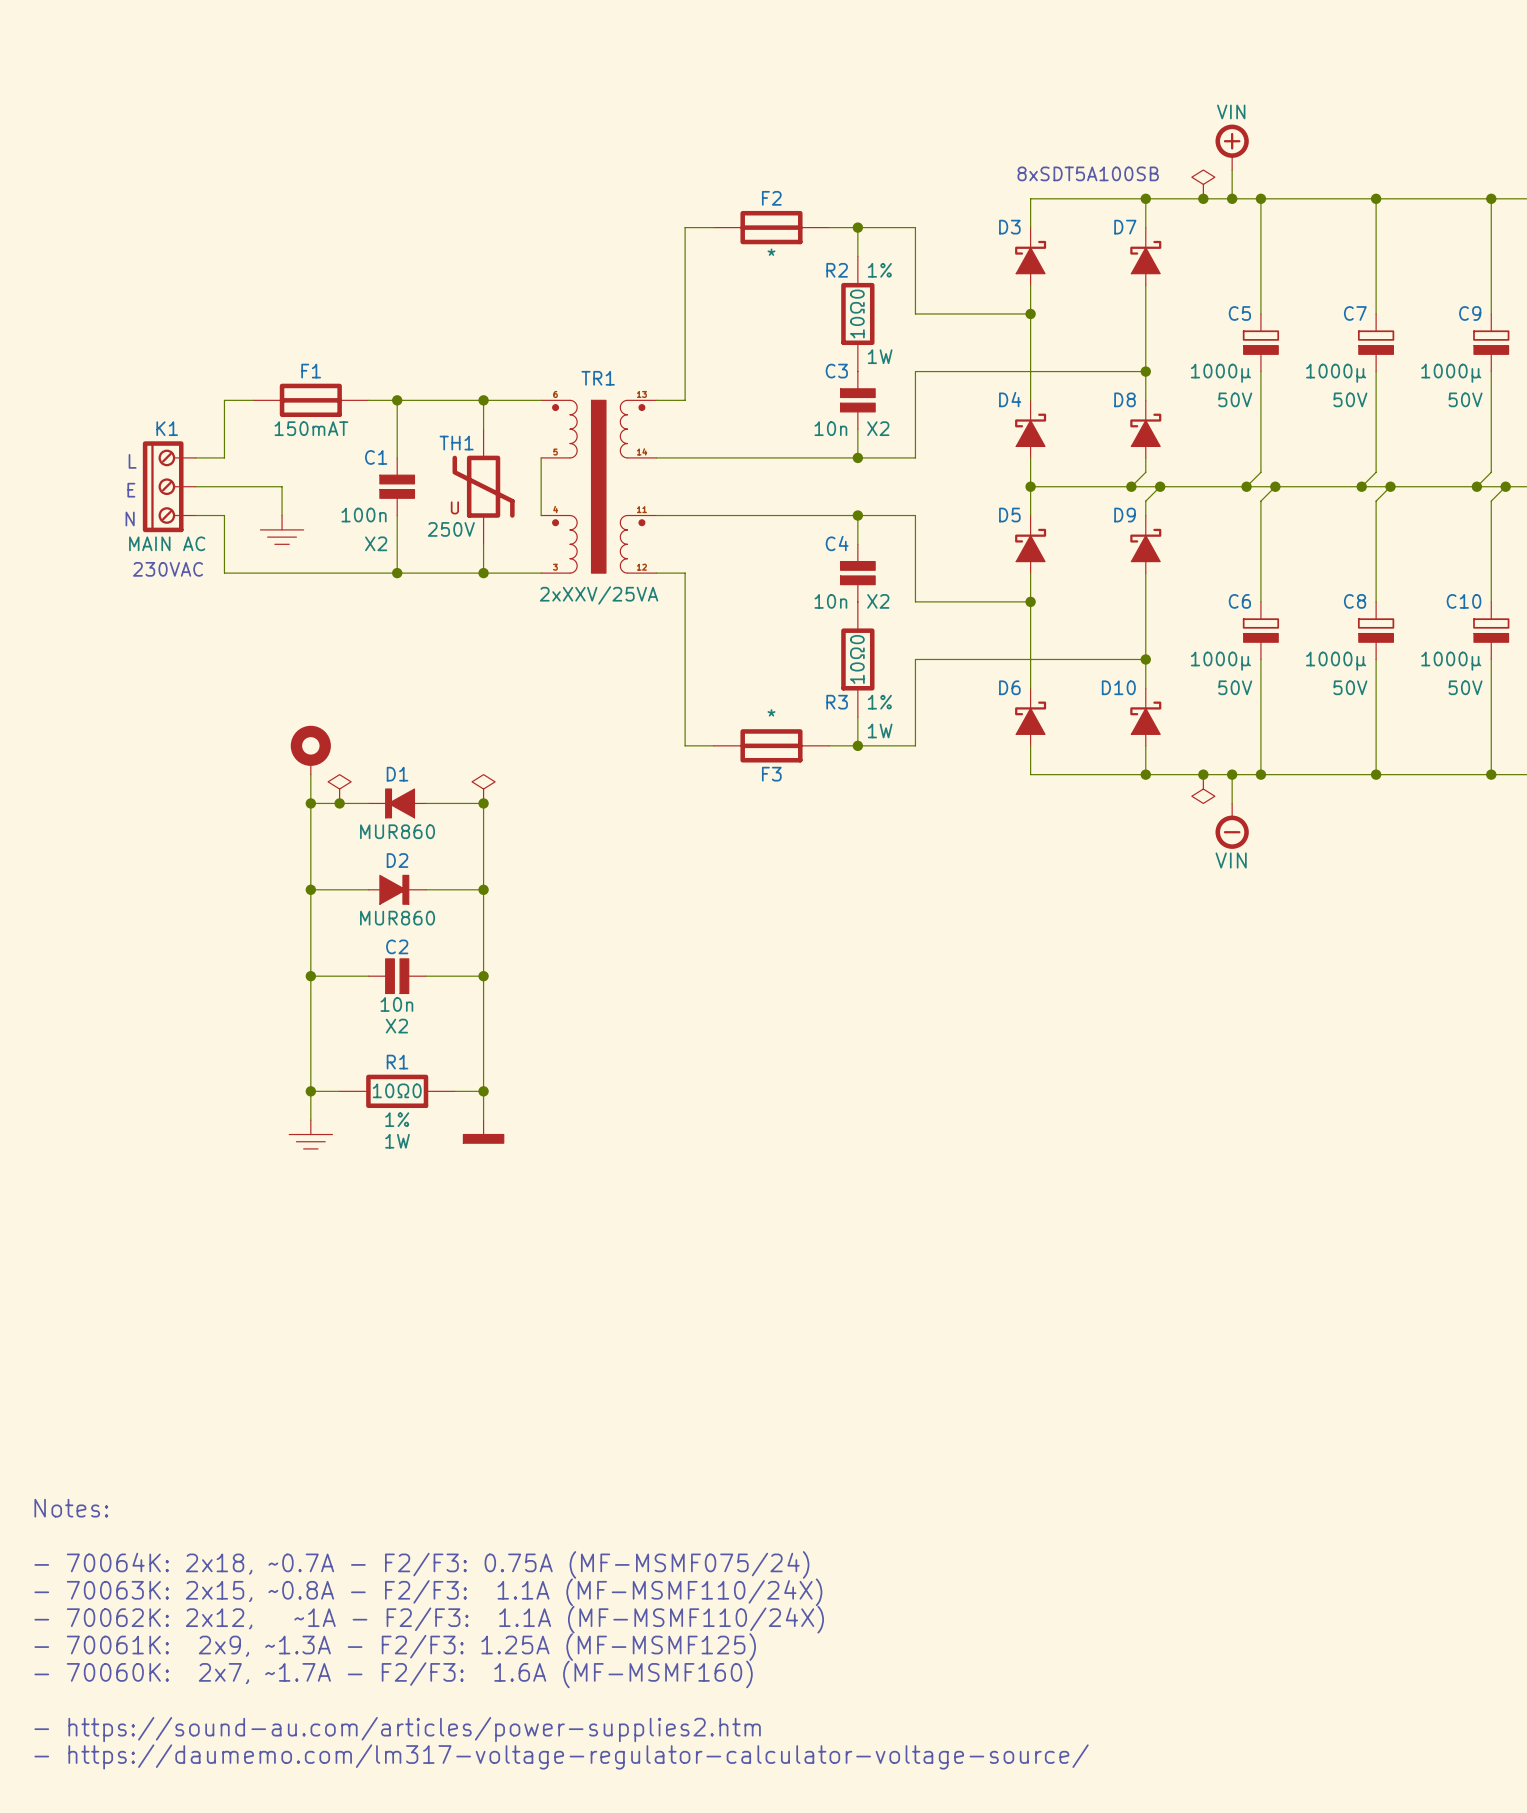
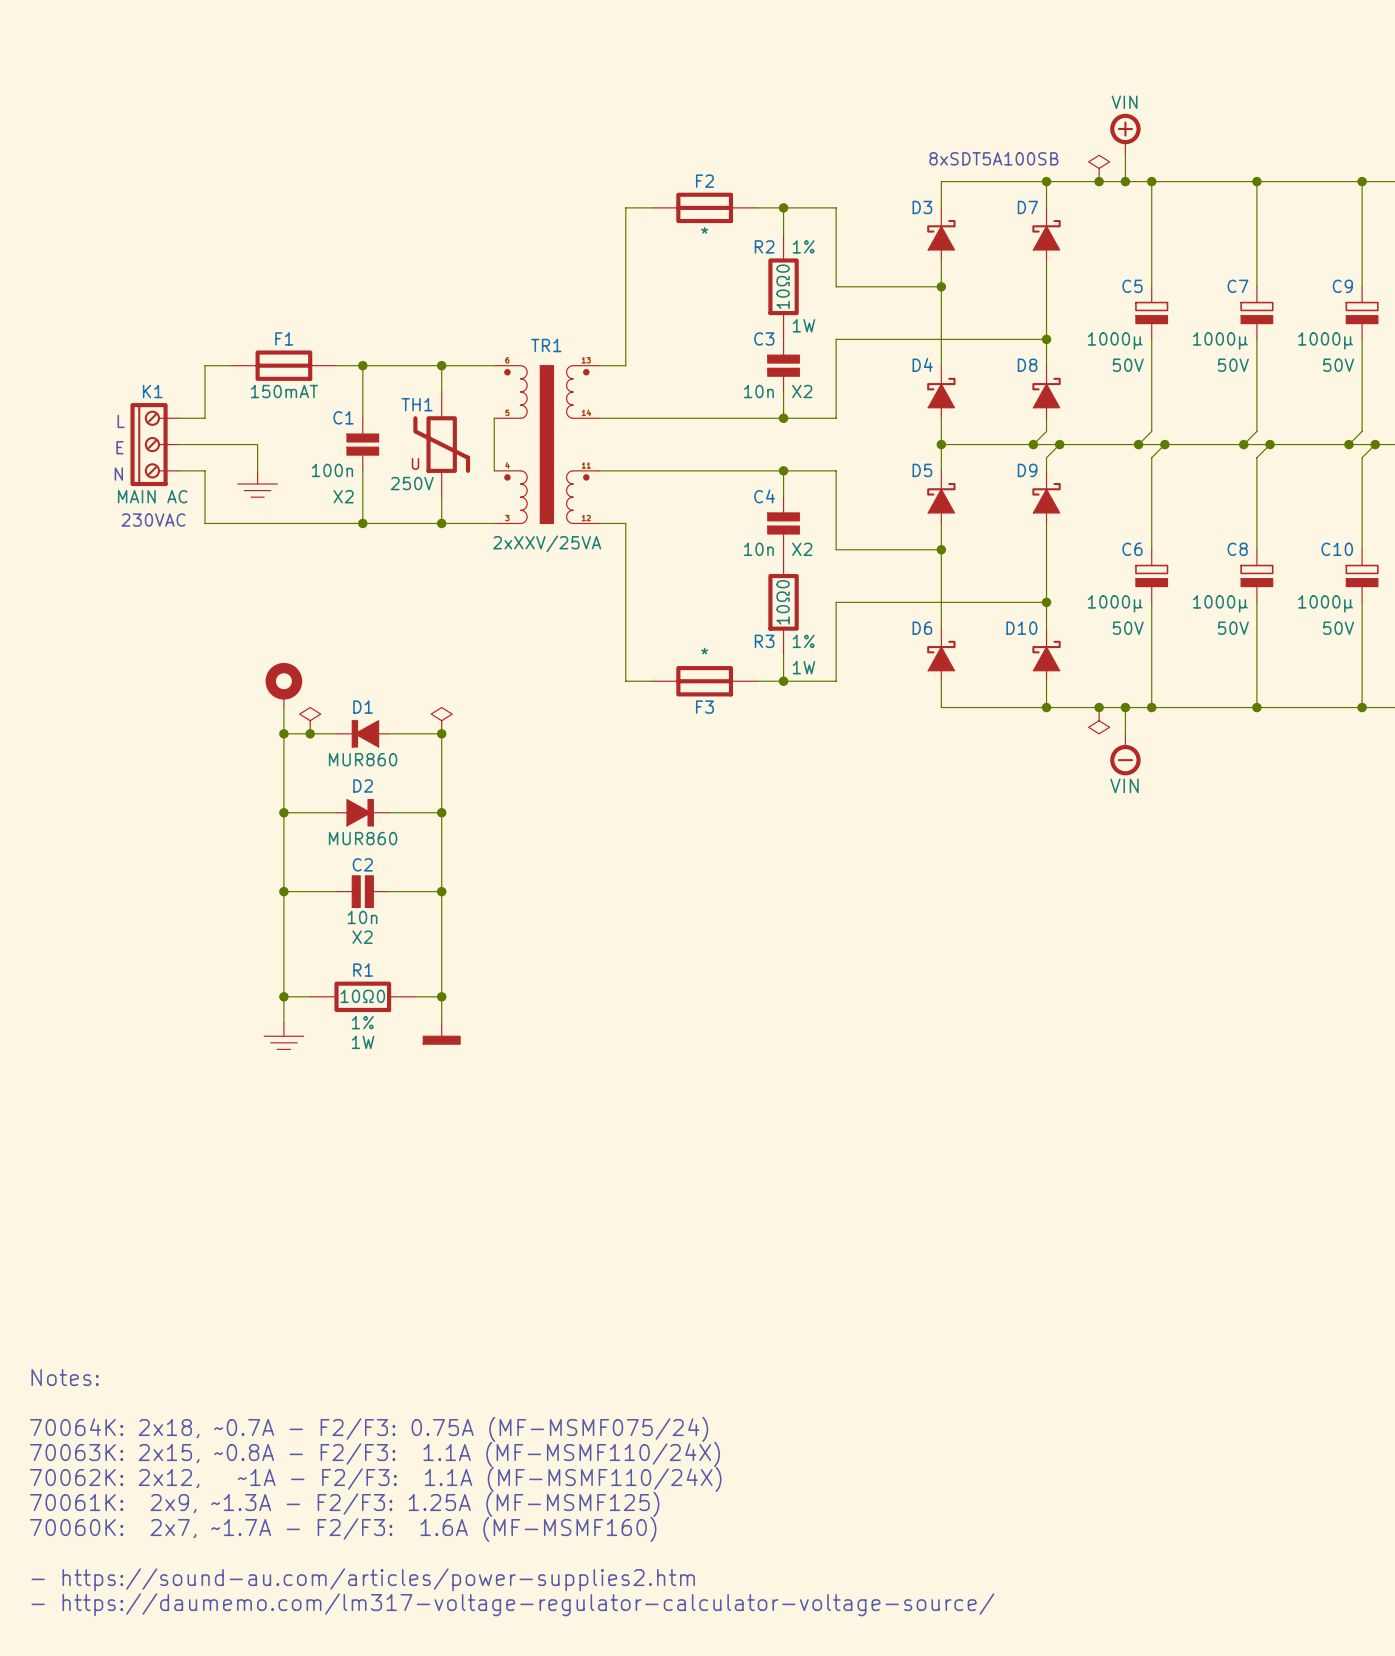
text: - 70064K: 2x18, ~0.7A - F2/F3: 0.75A (MF-MSMF075/24) (421, 1564) -> 70064K: 2x18, ~0.7A - F2/F3: 0.75A (MF-MSMF075/24) (369, 1429)
text: - 70063K: 2x15, ~0.8A - F2/F3: 1.1A (MF-MSMF110/24X) (428, 1592) -> 70063K: 2x15, ~0.8A - F2/F3: 1.1A (MF-MSMF110/24X) (375, 1454)
text: - 70062K: 2x12, ~1A - F2/F3: 1.1A (MF-MSMF110/24X) (429, 1619) -> 70062K: 2x12, ~1A - F2/F3: 1.1A (MF-MSMF110/24X) (375, 1479)
text: - 70061K: 2x9, ~1.3A - F2/F3: 1.25A (MF-MSMF125) (395, 1647) -> 70061K: 2x9, ~1.3A - F2/F3: 1.25A (MF-MSMF125) (344, 1504)
text: - 70060K: 2x7, ~1.7A - F2/F3: 1.6A (MF-MSMF160) (393, 1674) -> 70060K: 2x7, ~1.7A - F2/F3: 1.6A (MF-MSMF160) (343, 1529)

